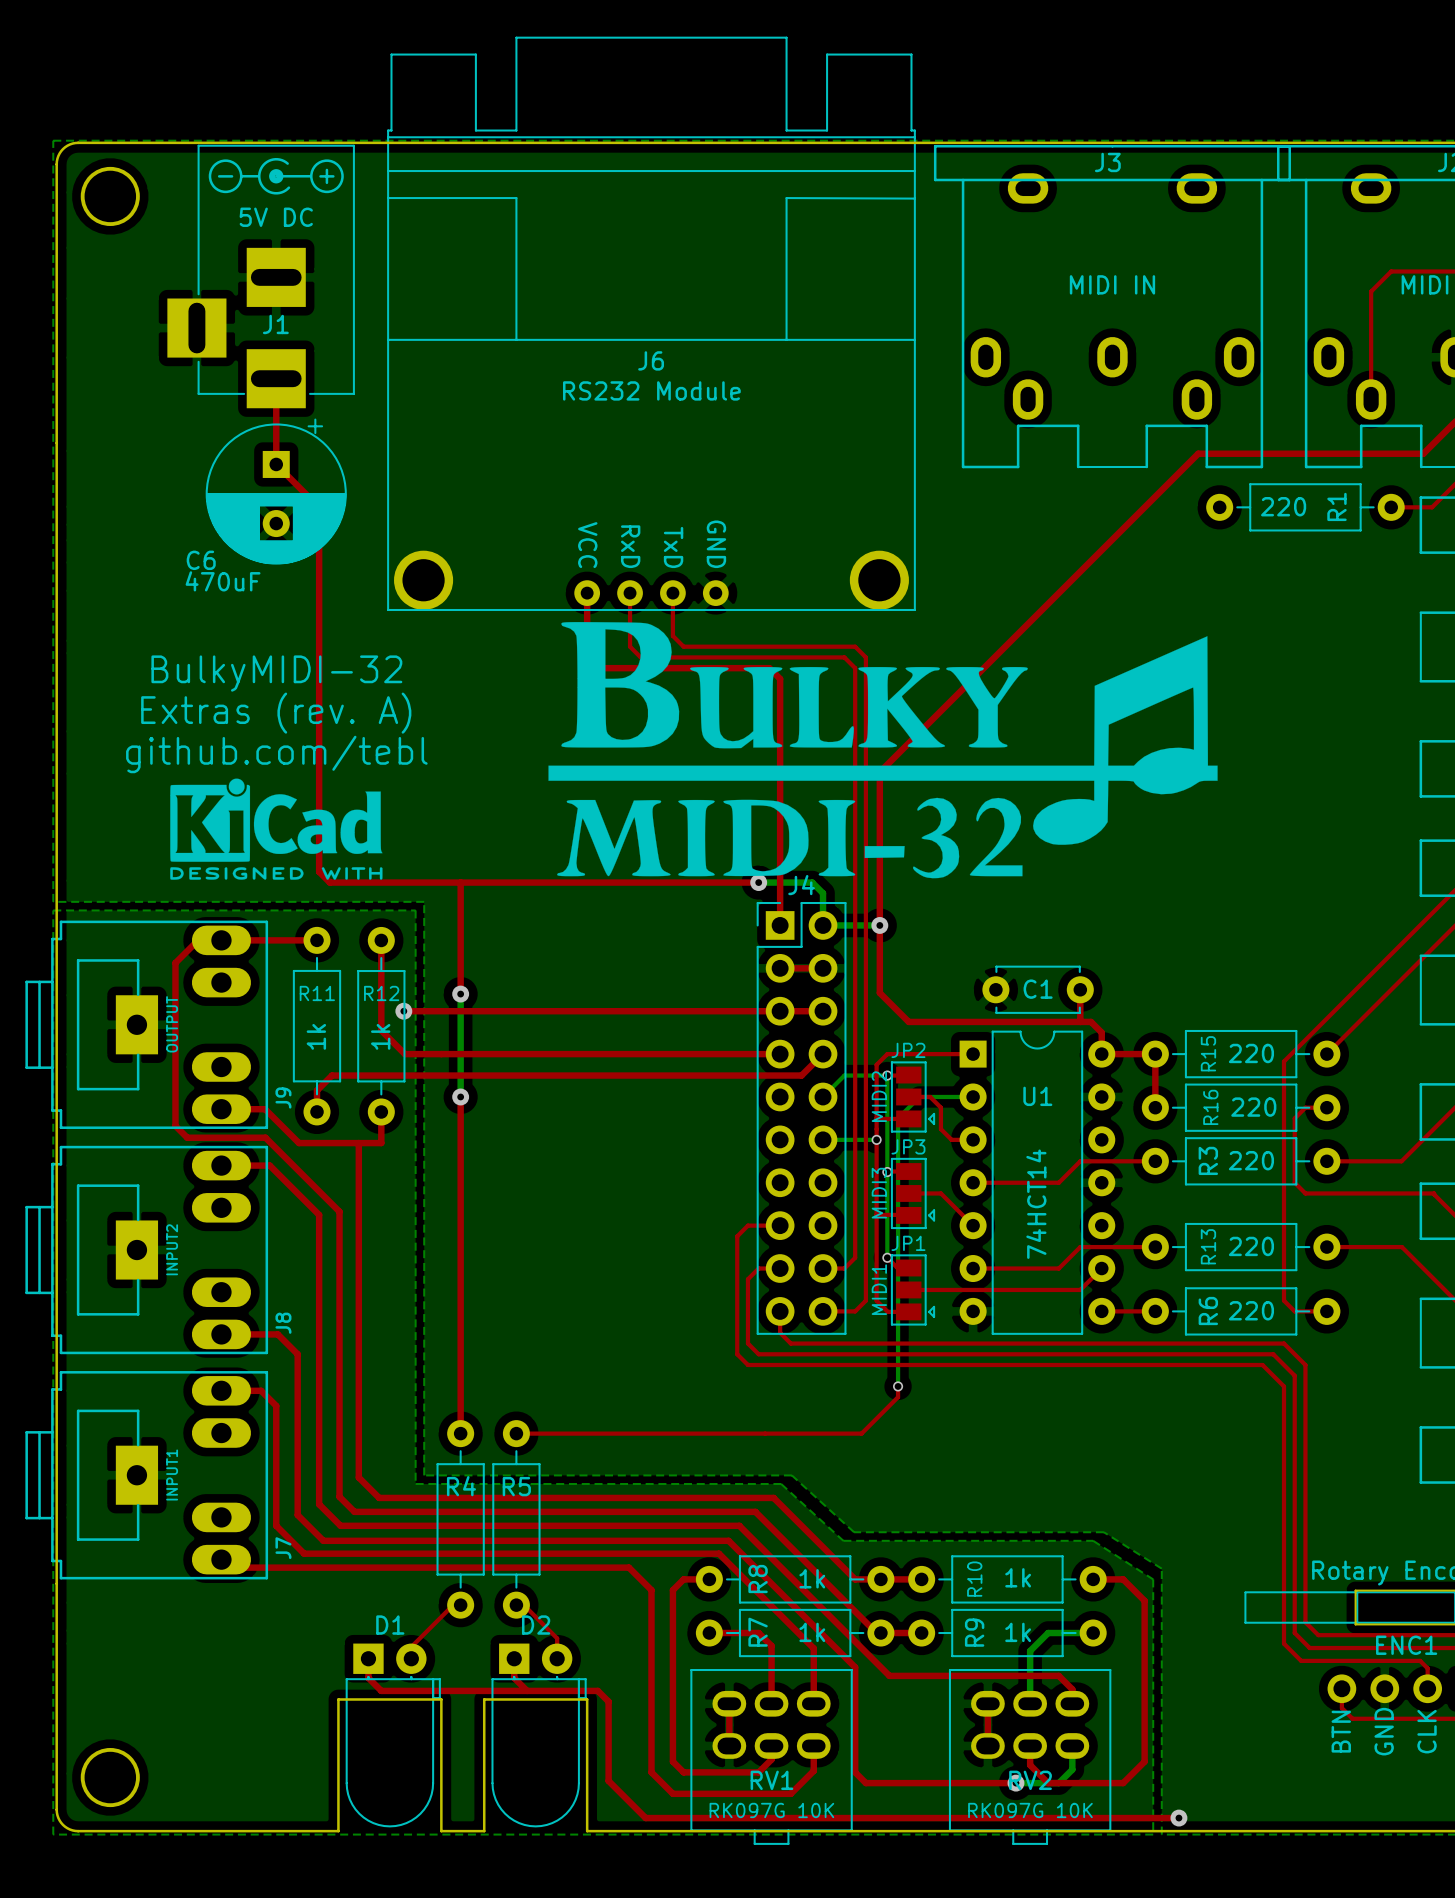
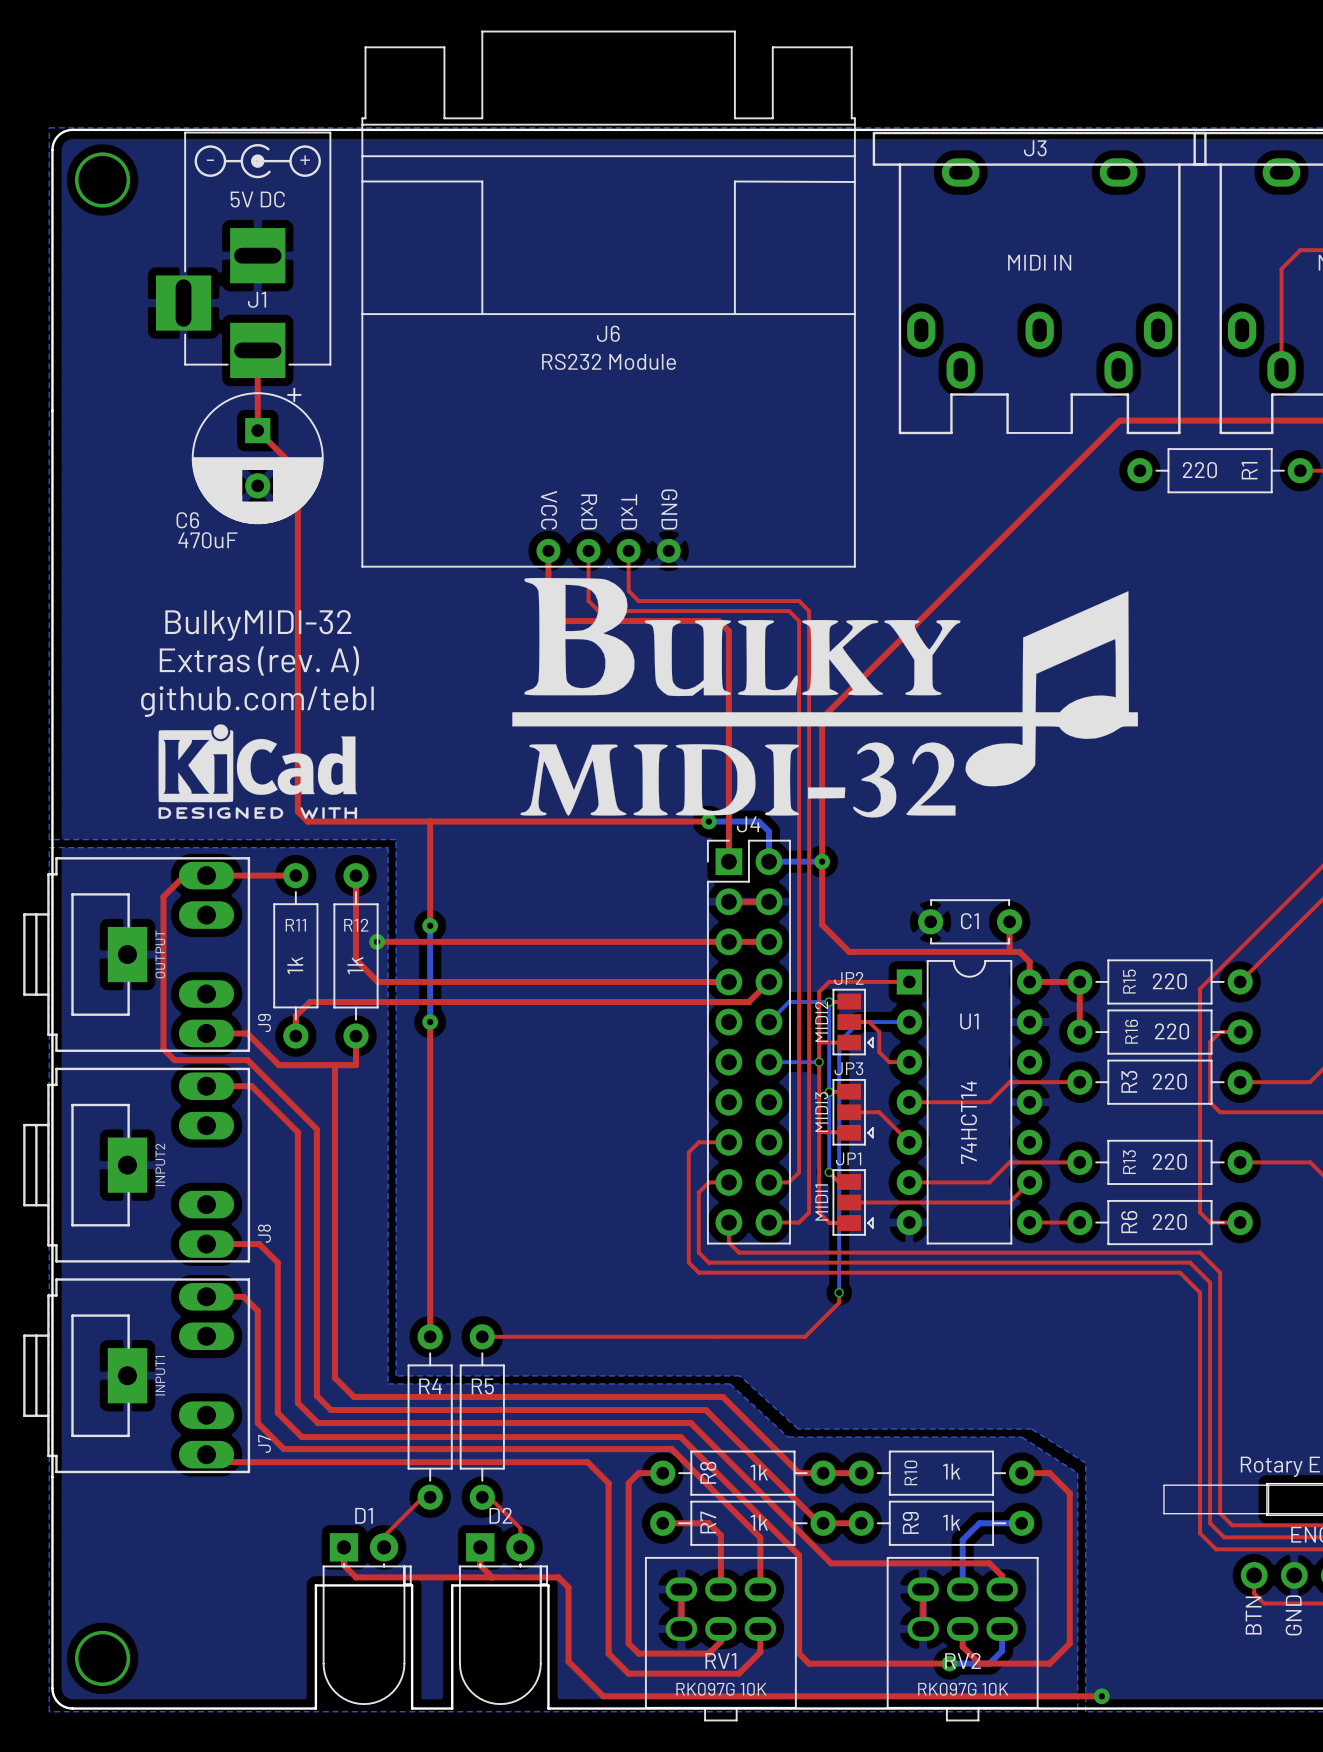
J6 footprint: [387, 36, 916, 612] -> [361, 30, 856, 568]

